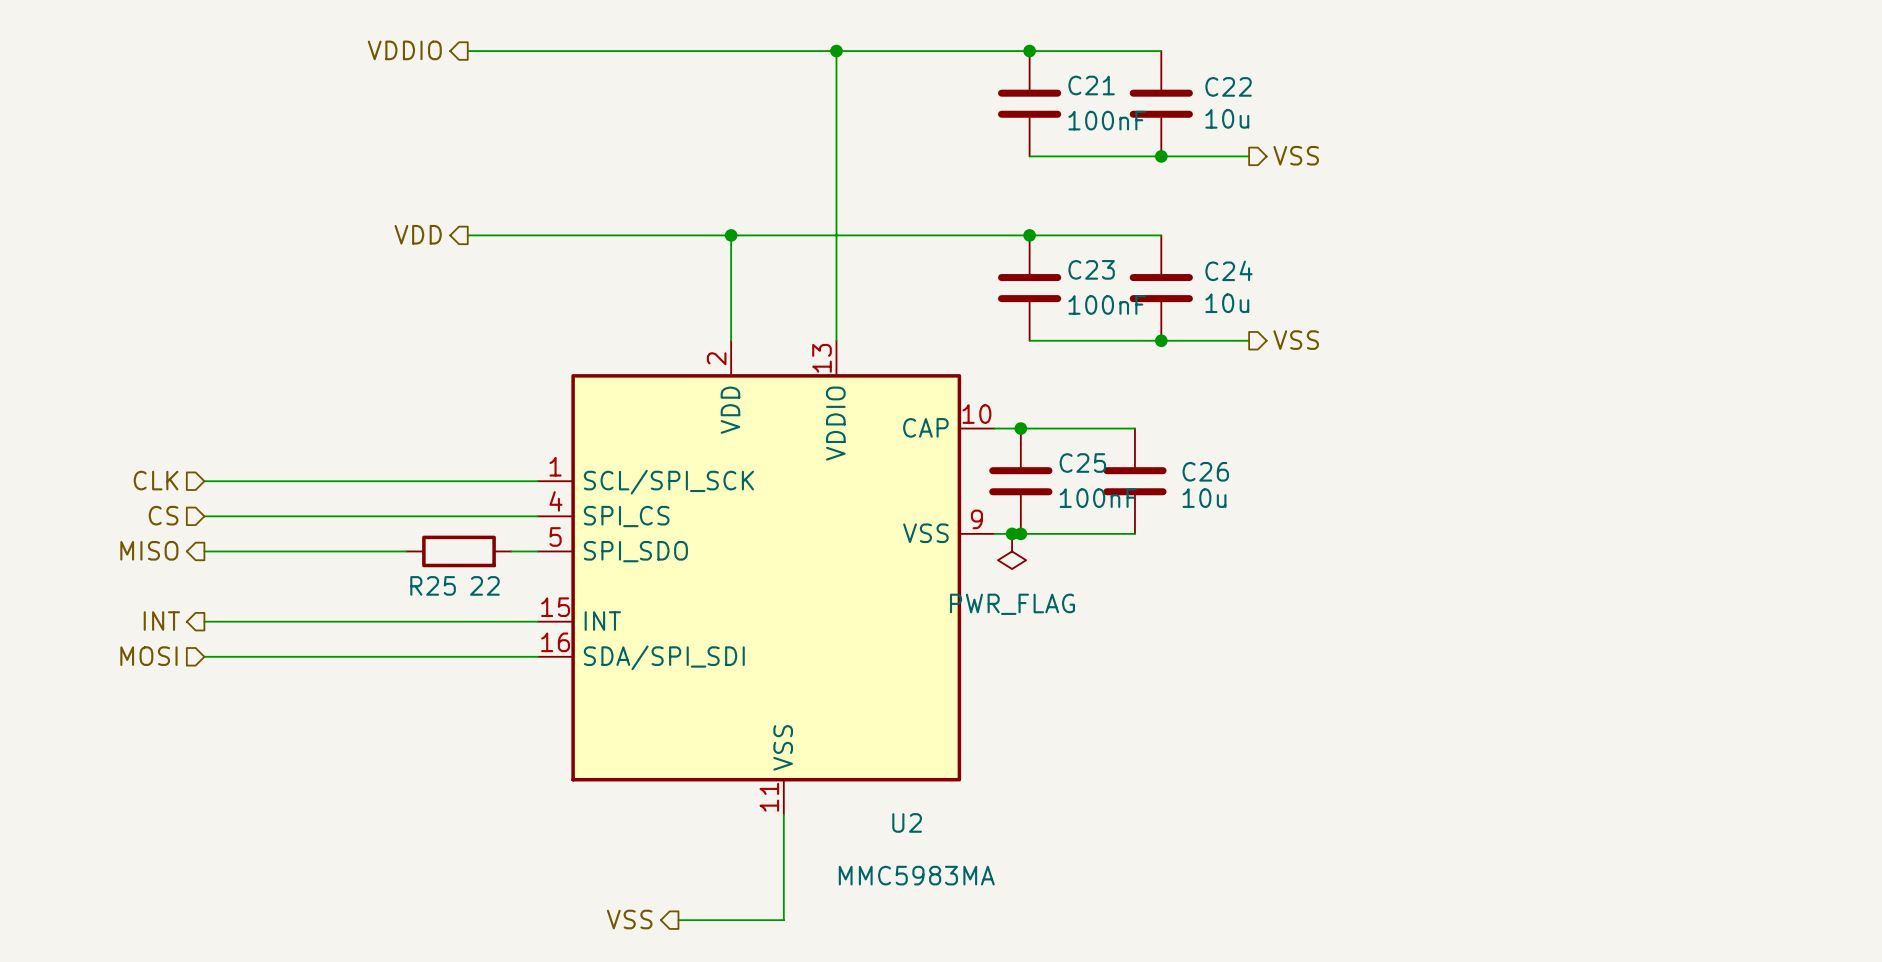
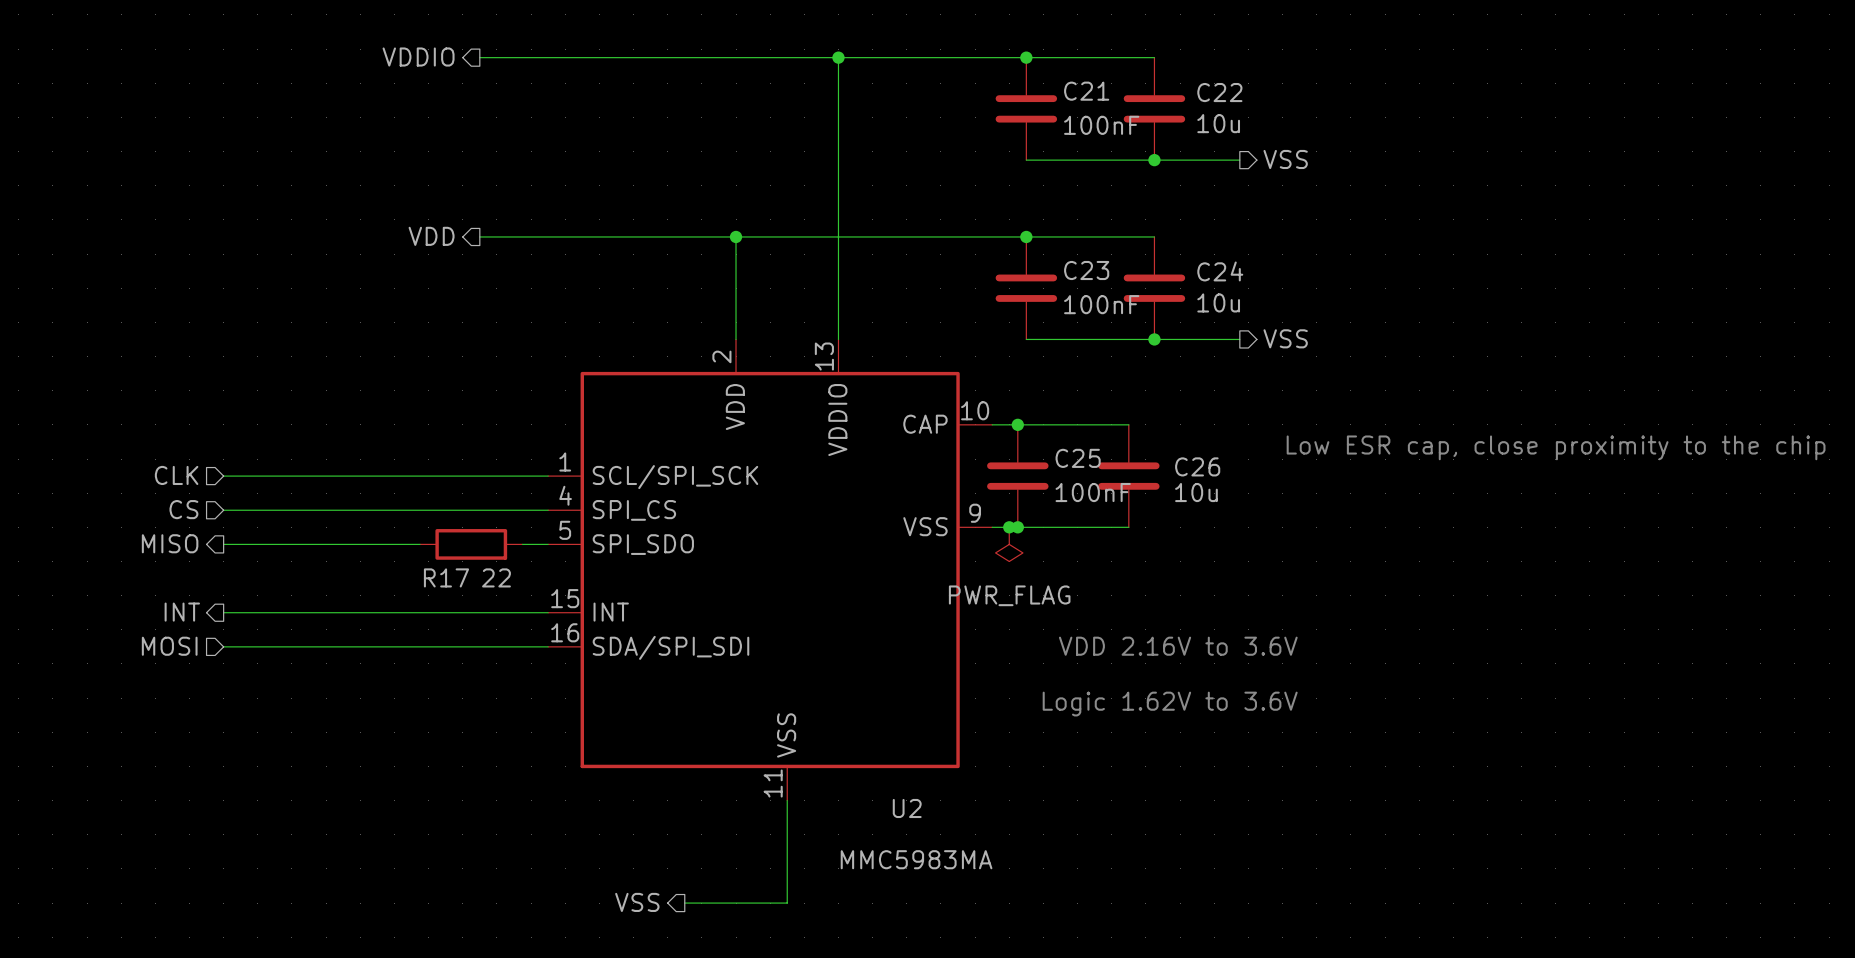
text: none -> Low ESR cap, close proximity to the chip (1556, 447)
R25 name: R25 (433, 585) -> R17 (446, 577)
text: none -> VDD 2.16V to 3.6V (1178, 646)
text: none -> Logic 1.62V to 3.6V (1170, 704)

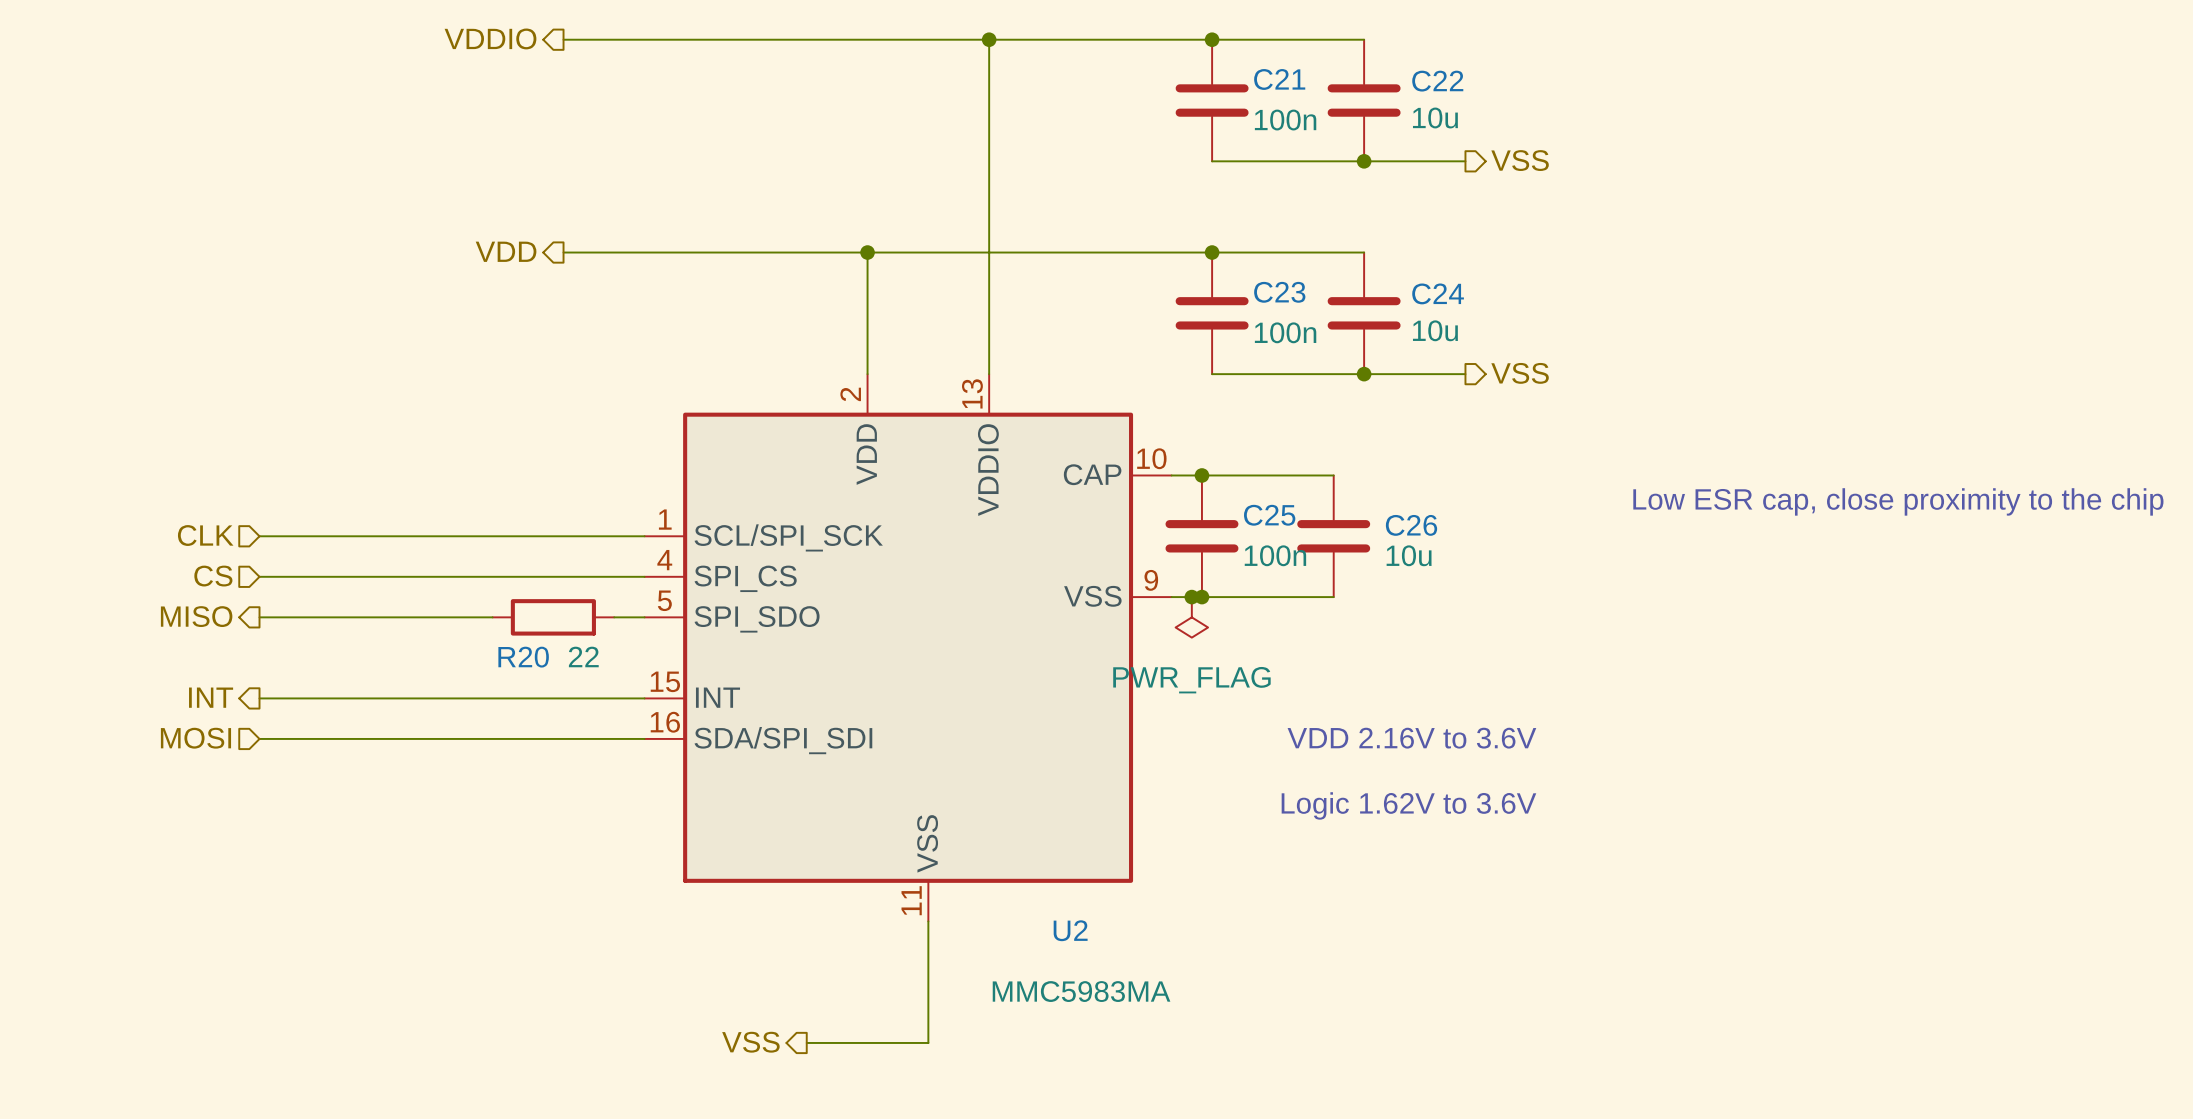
C21 value: 100nF (1101, 125) -> 100n (1285, 120)
C23 value: 100nF (1101, 304) -> 100n (1285, 332)
C25 value: 100nF (1093, 492) -> 100n (1275, 555)
R17 name: R17 (446, 577) -> R20 (523, 657)

